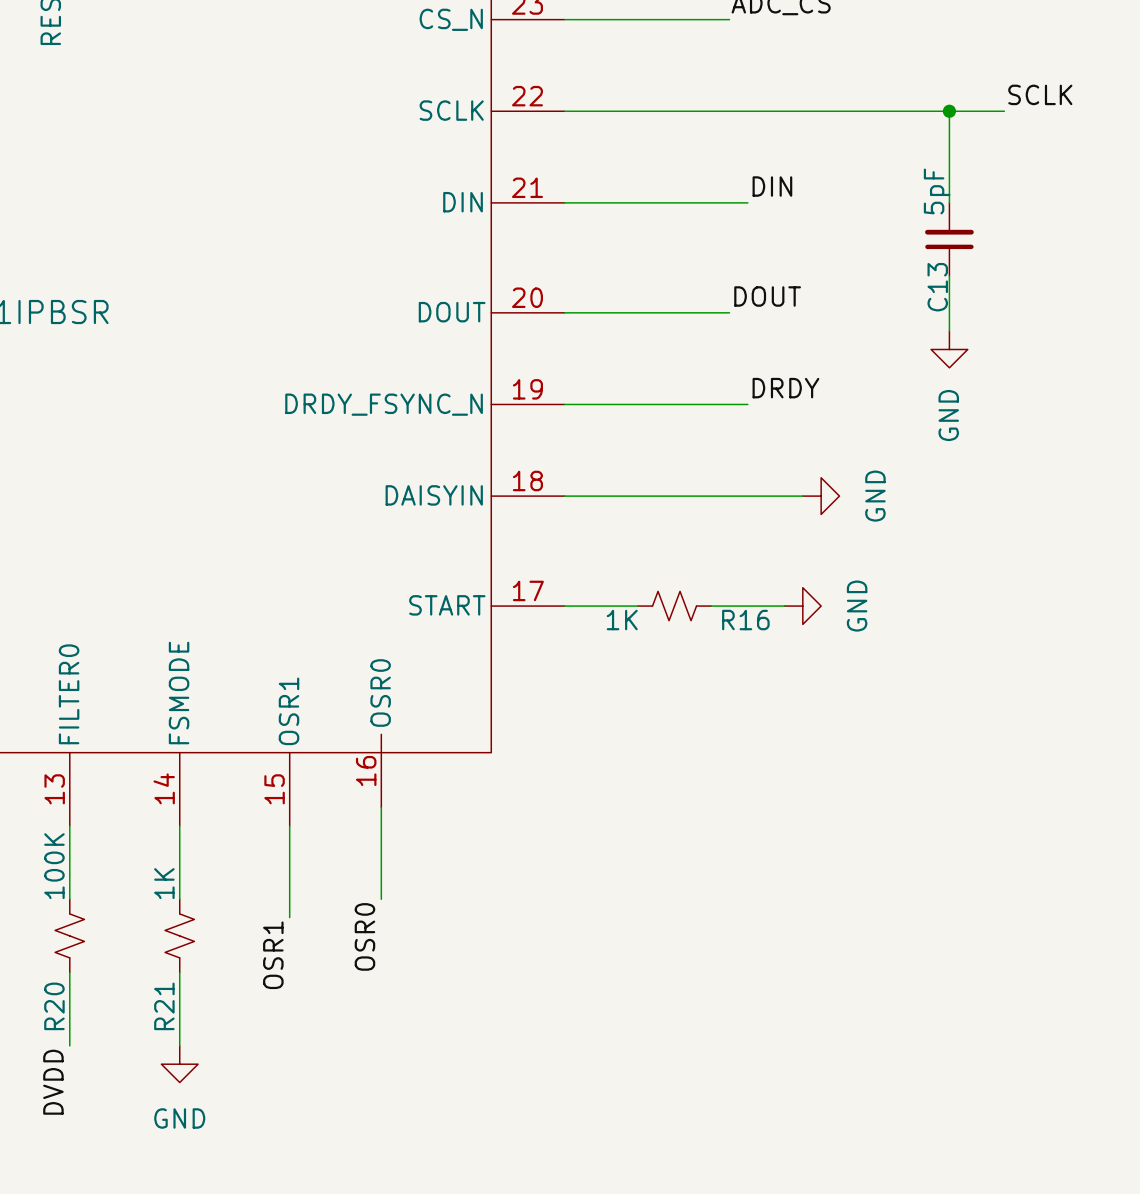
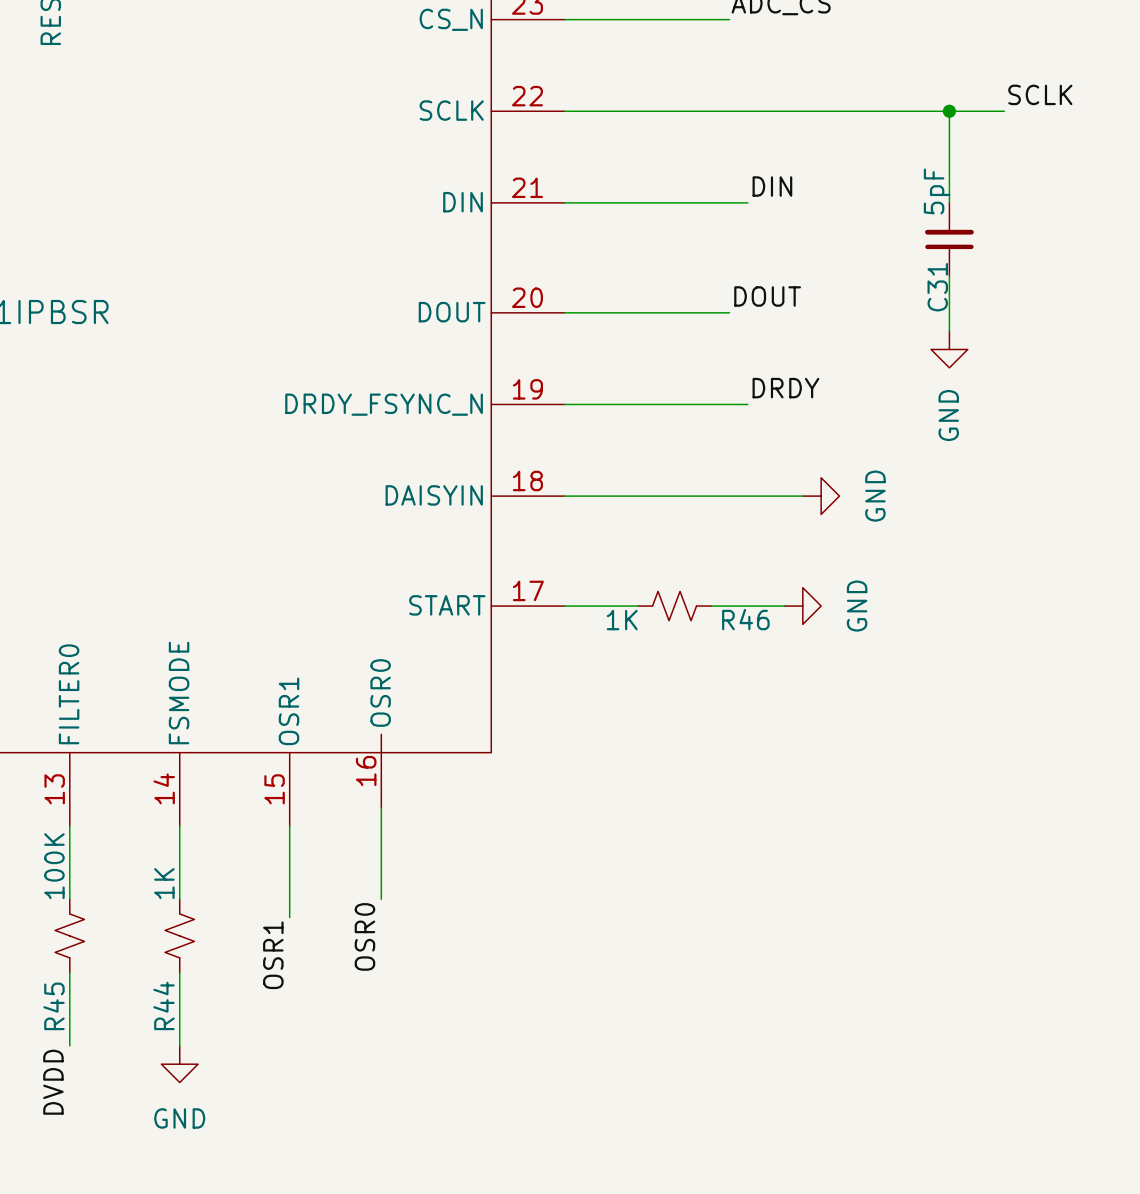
C13 name: C13 (937, 287) -> C31 (937, 287)
R16 name: R16 (745, 620) -> R46 (745, 619)
R20 name: R20 (54, 1006) -> R45 (54, 1006)
R21 name: R21 (164, 1006) -> R44 (163, 1005)

